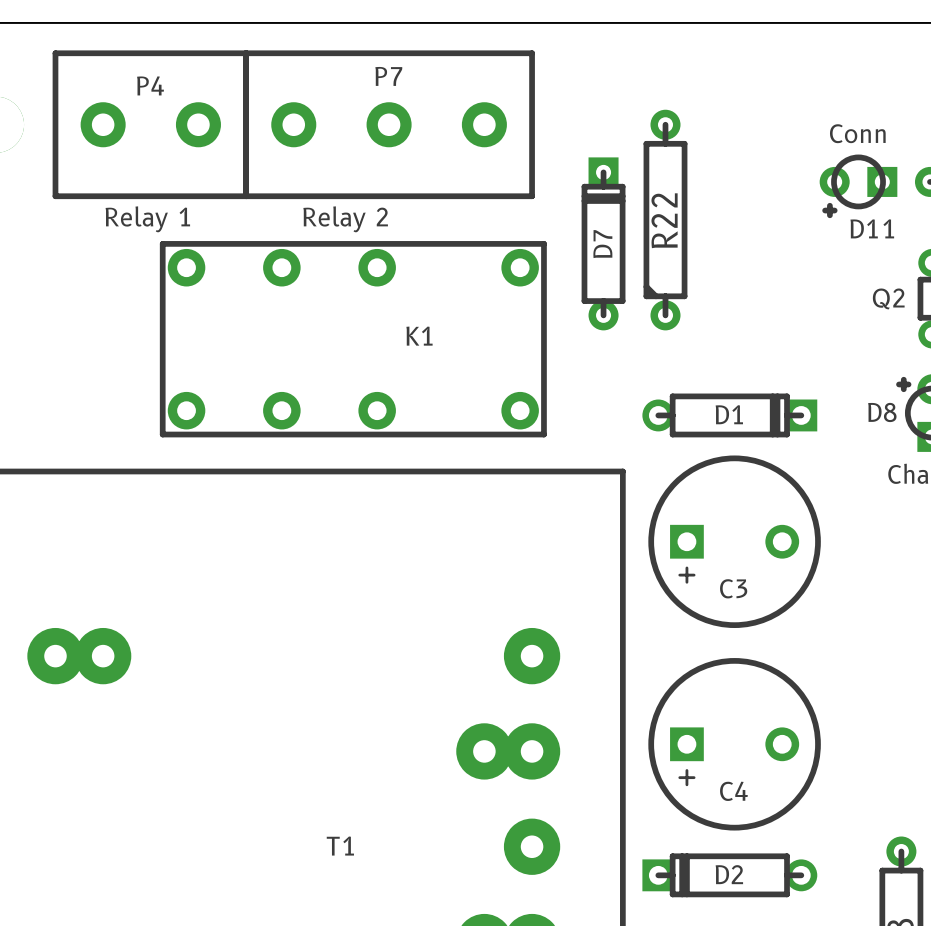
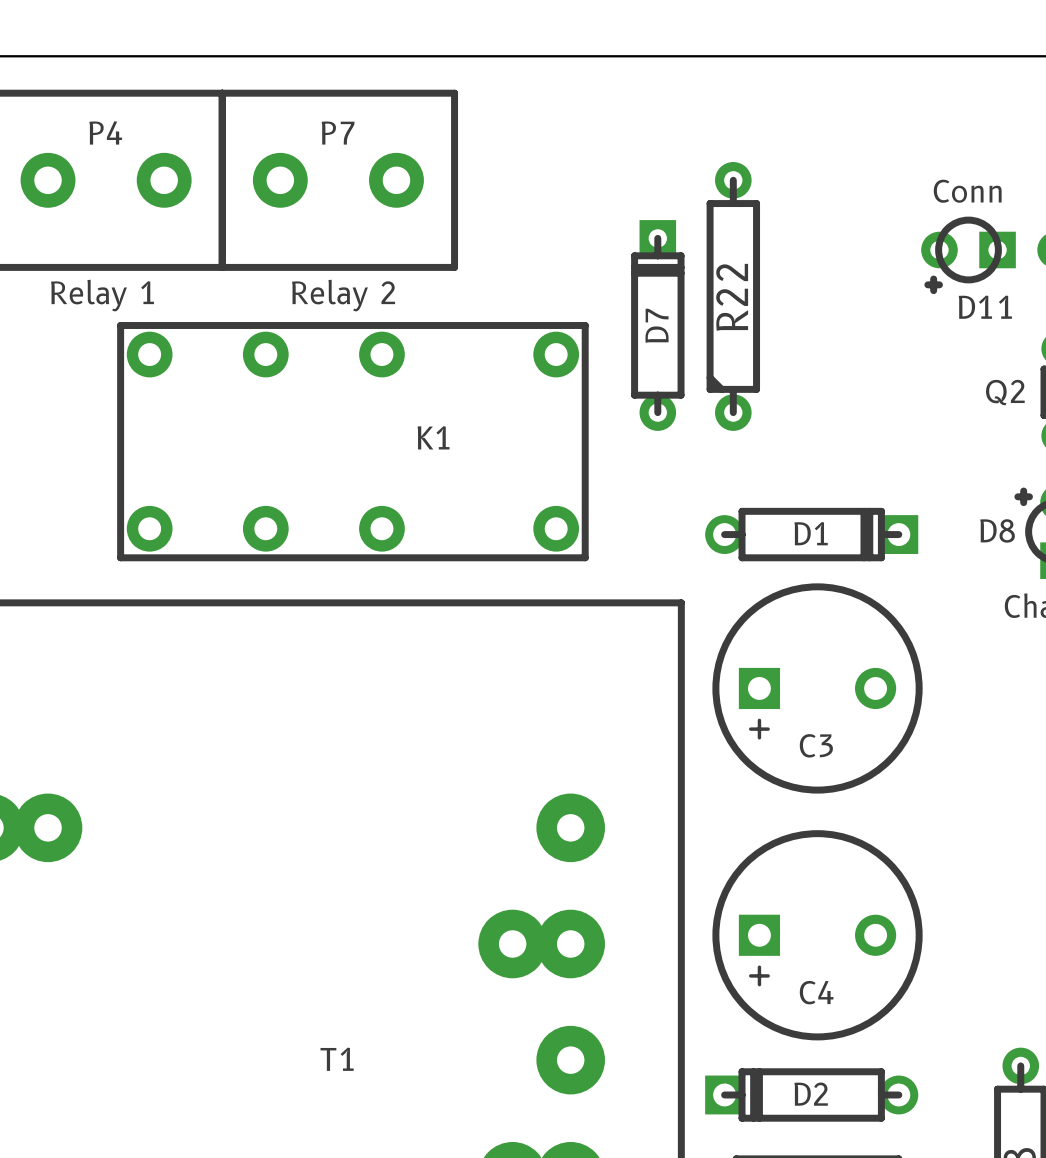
P7 footprint: [243, 50, 535, 200] -> [218, 89, 459, 271]

